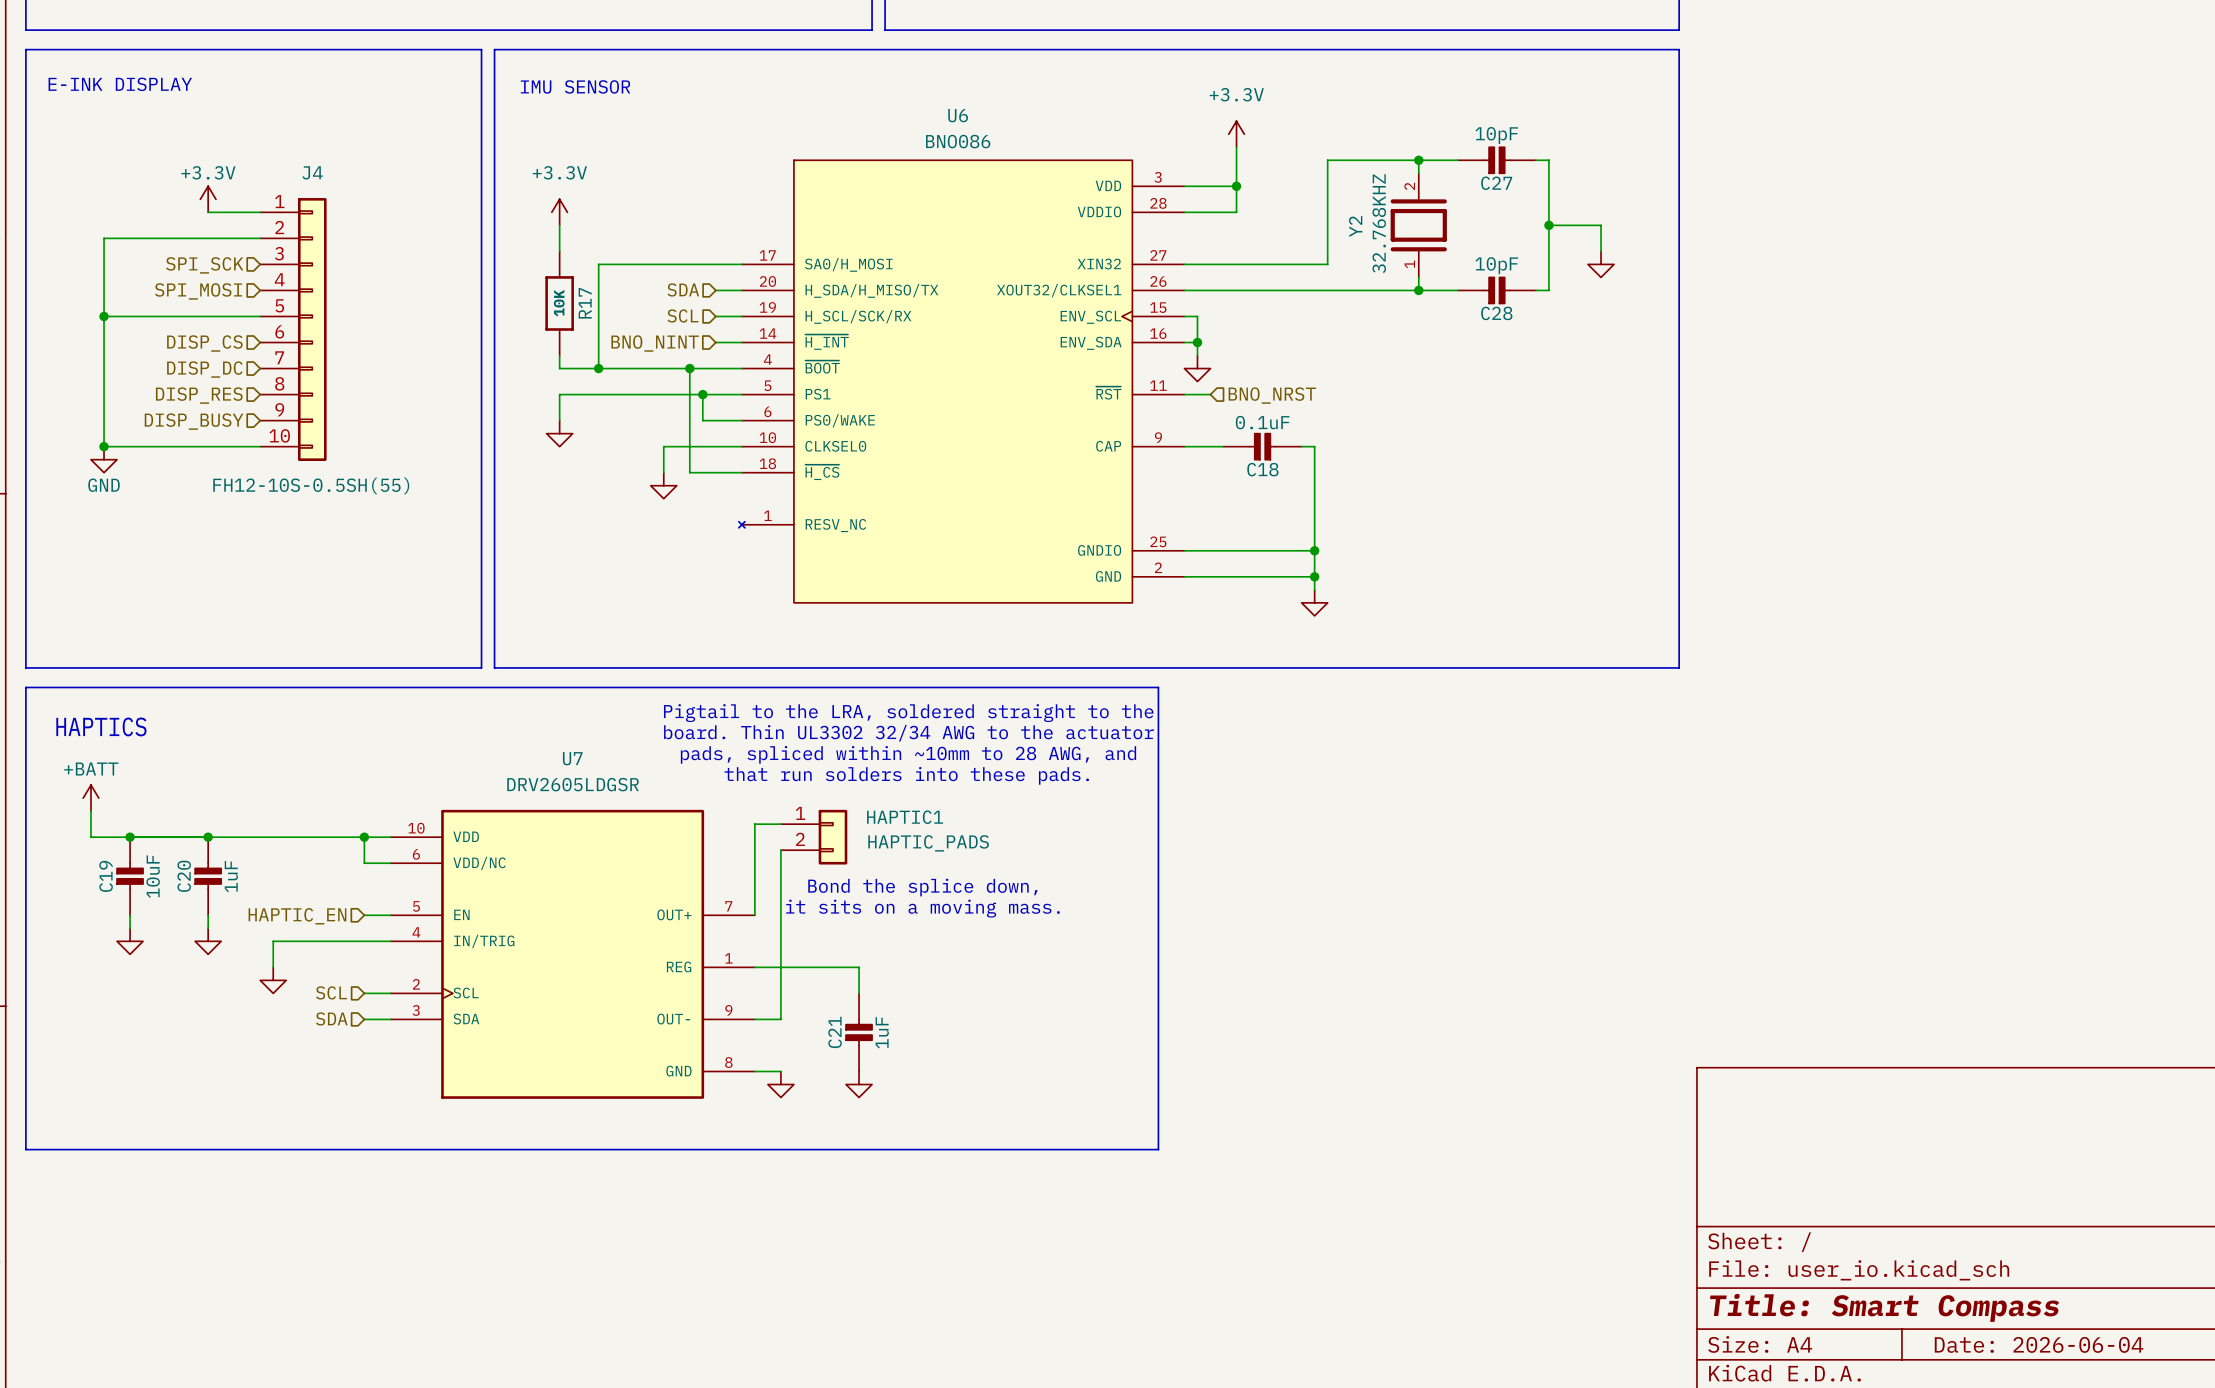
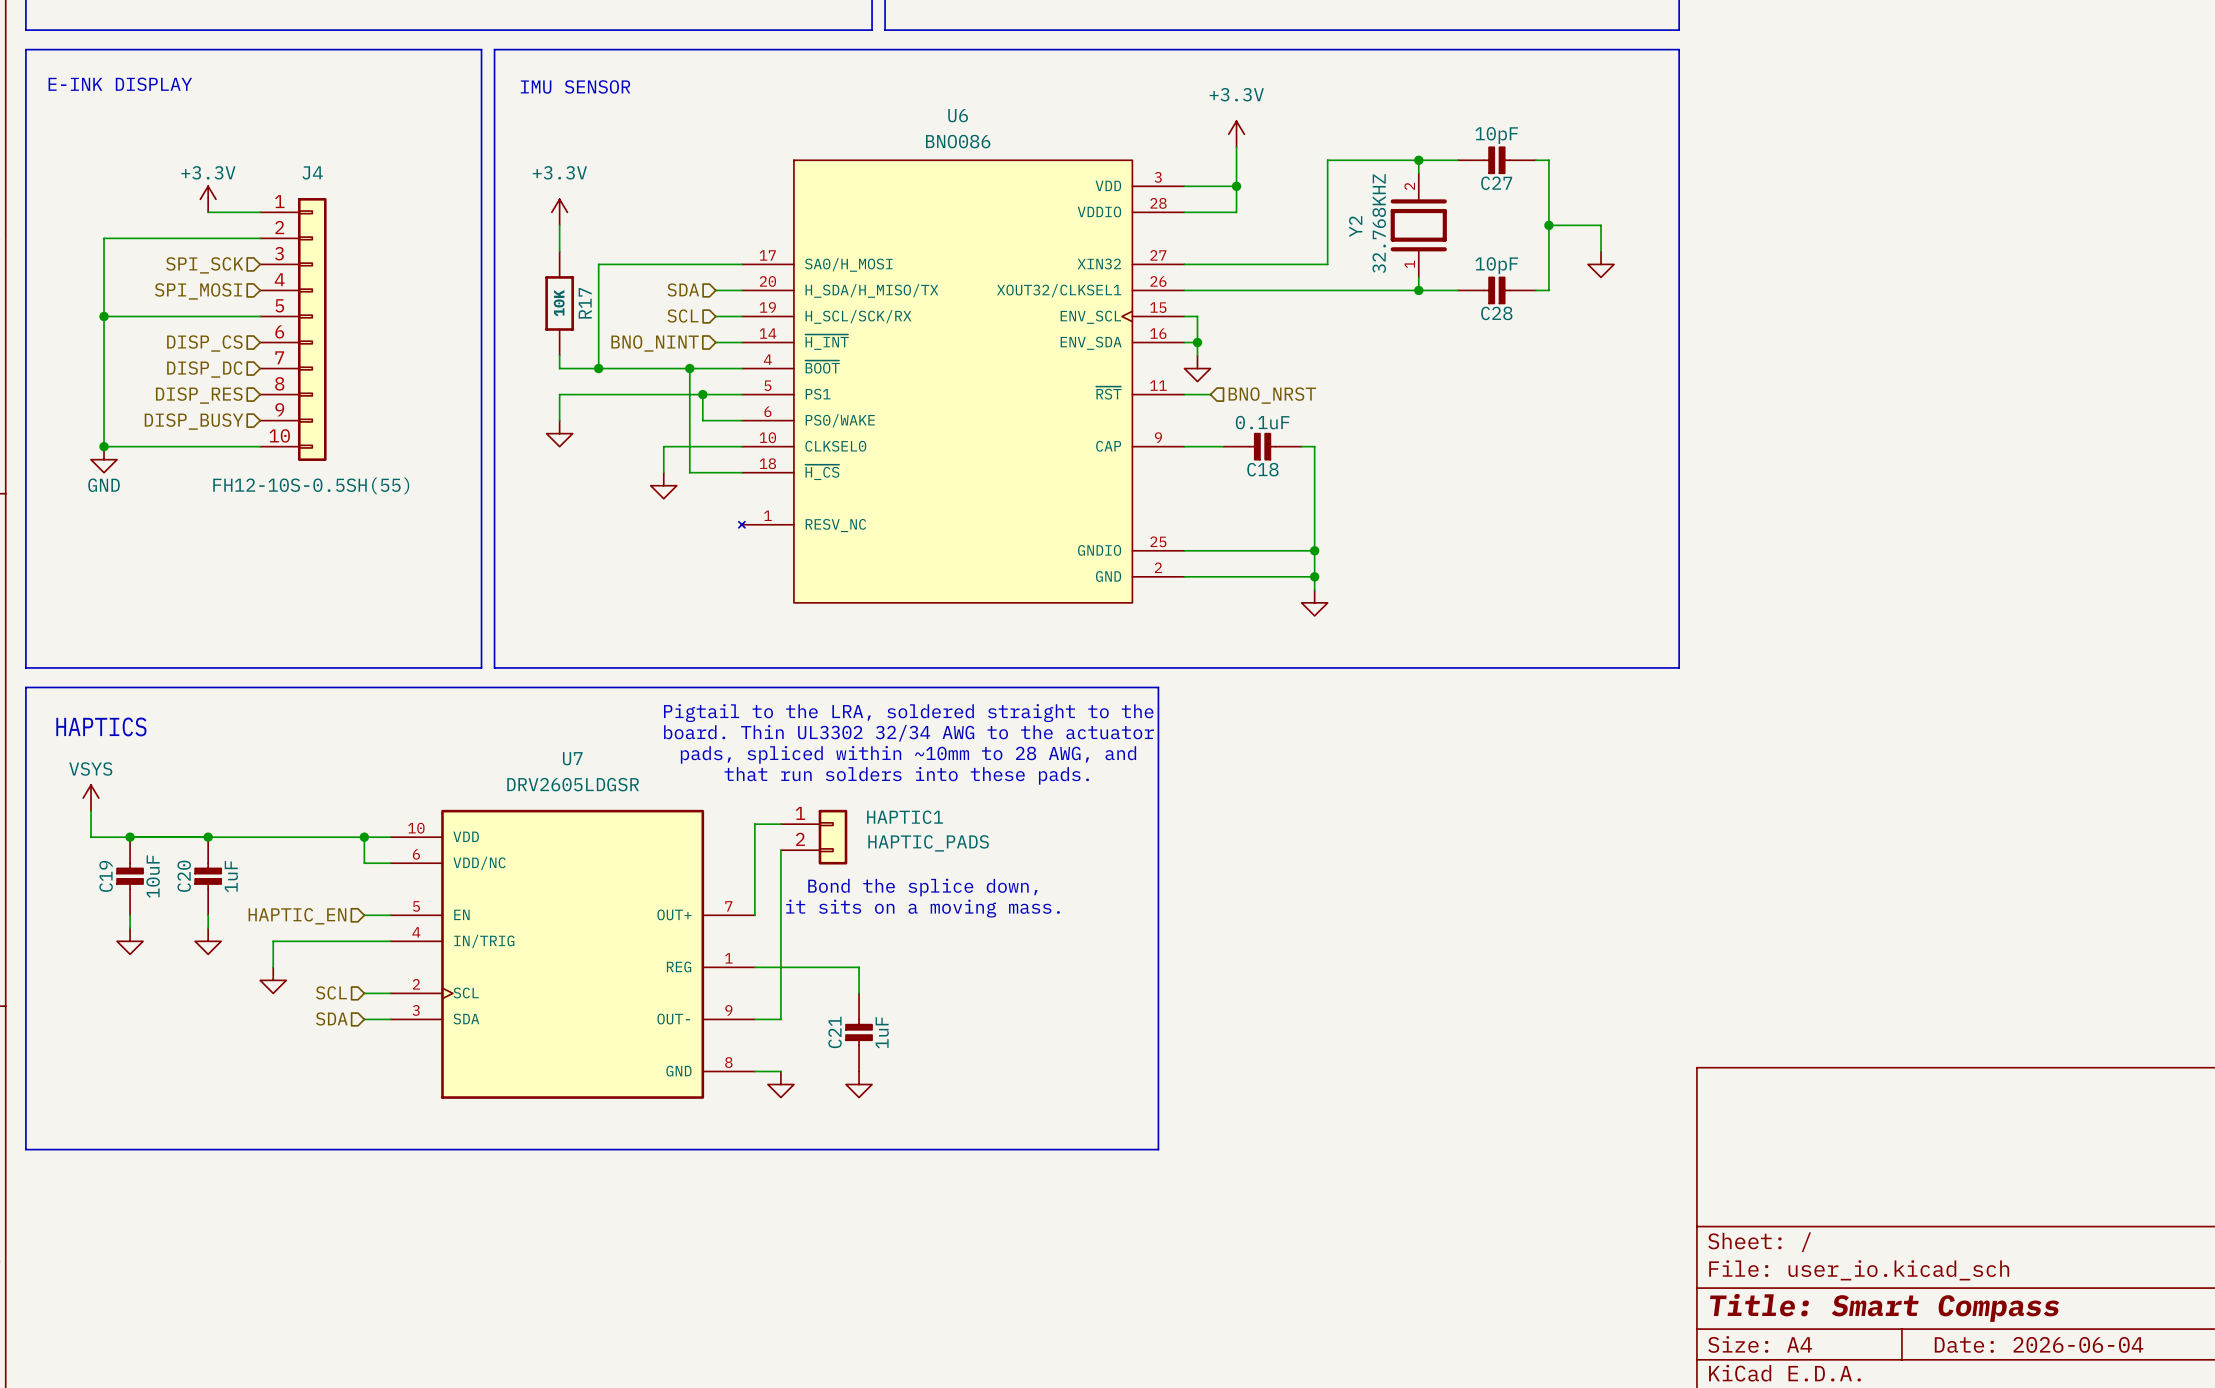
power symbol: +BATT (91, 798) -> VSYS (91, 798)

